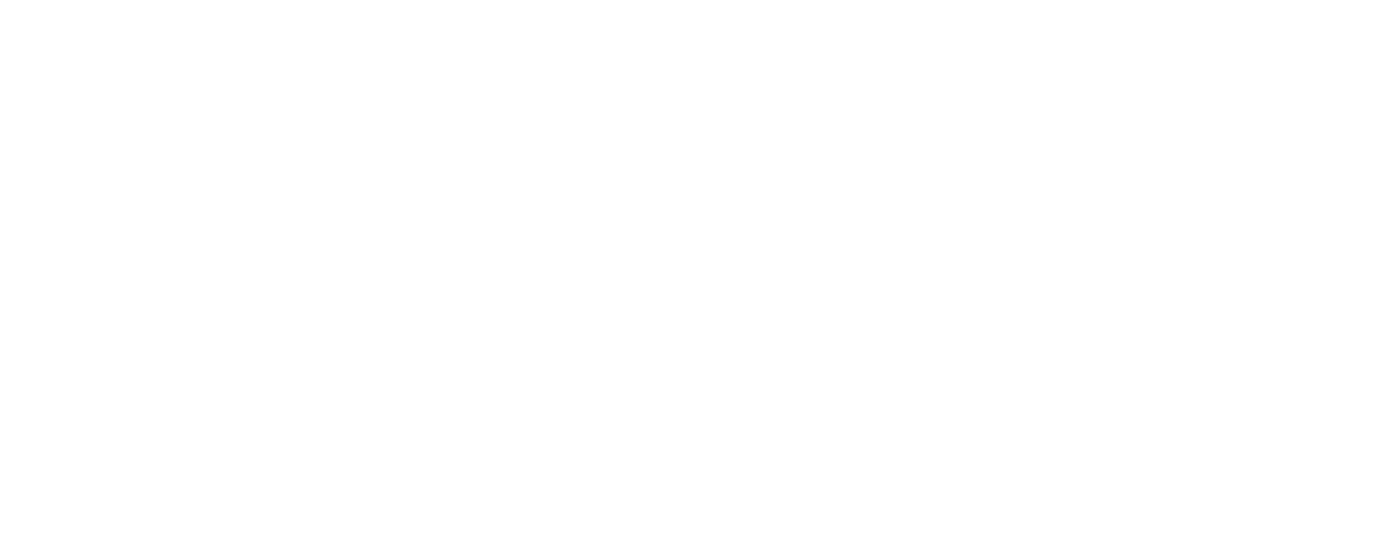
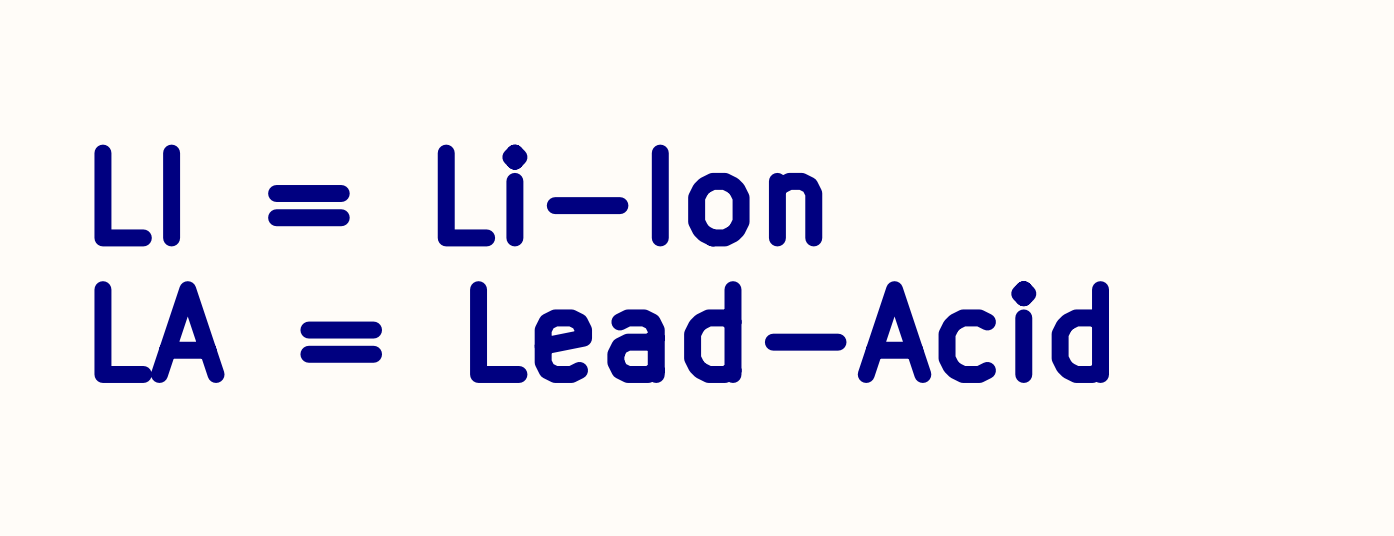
text: none -> LI = Li-Ion (458, 195)
text: none -> LA = Lead-Acid (601, 332)

